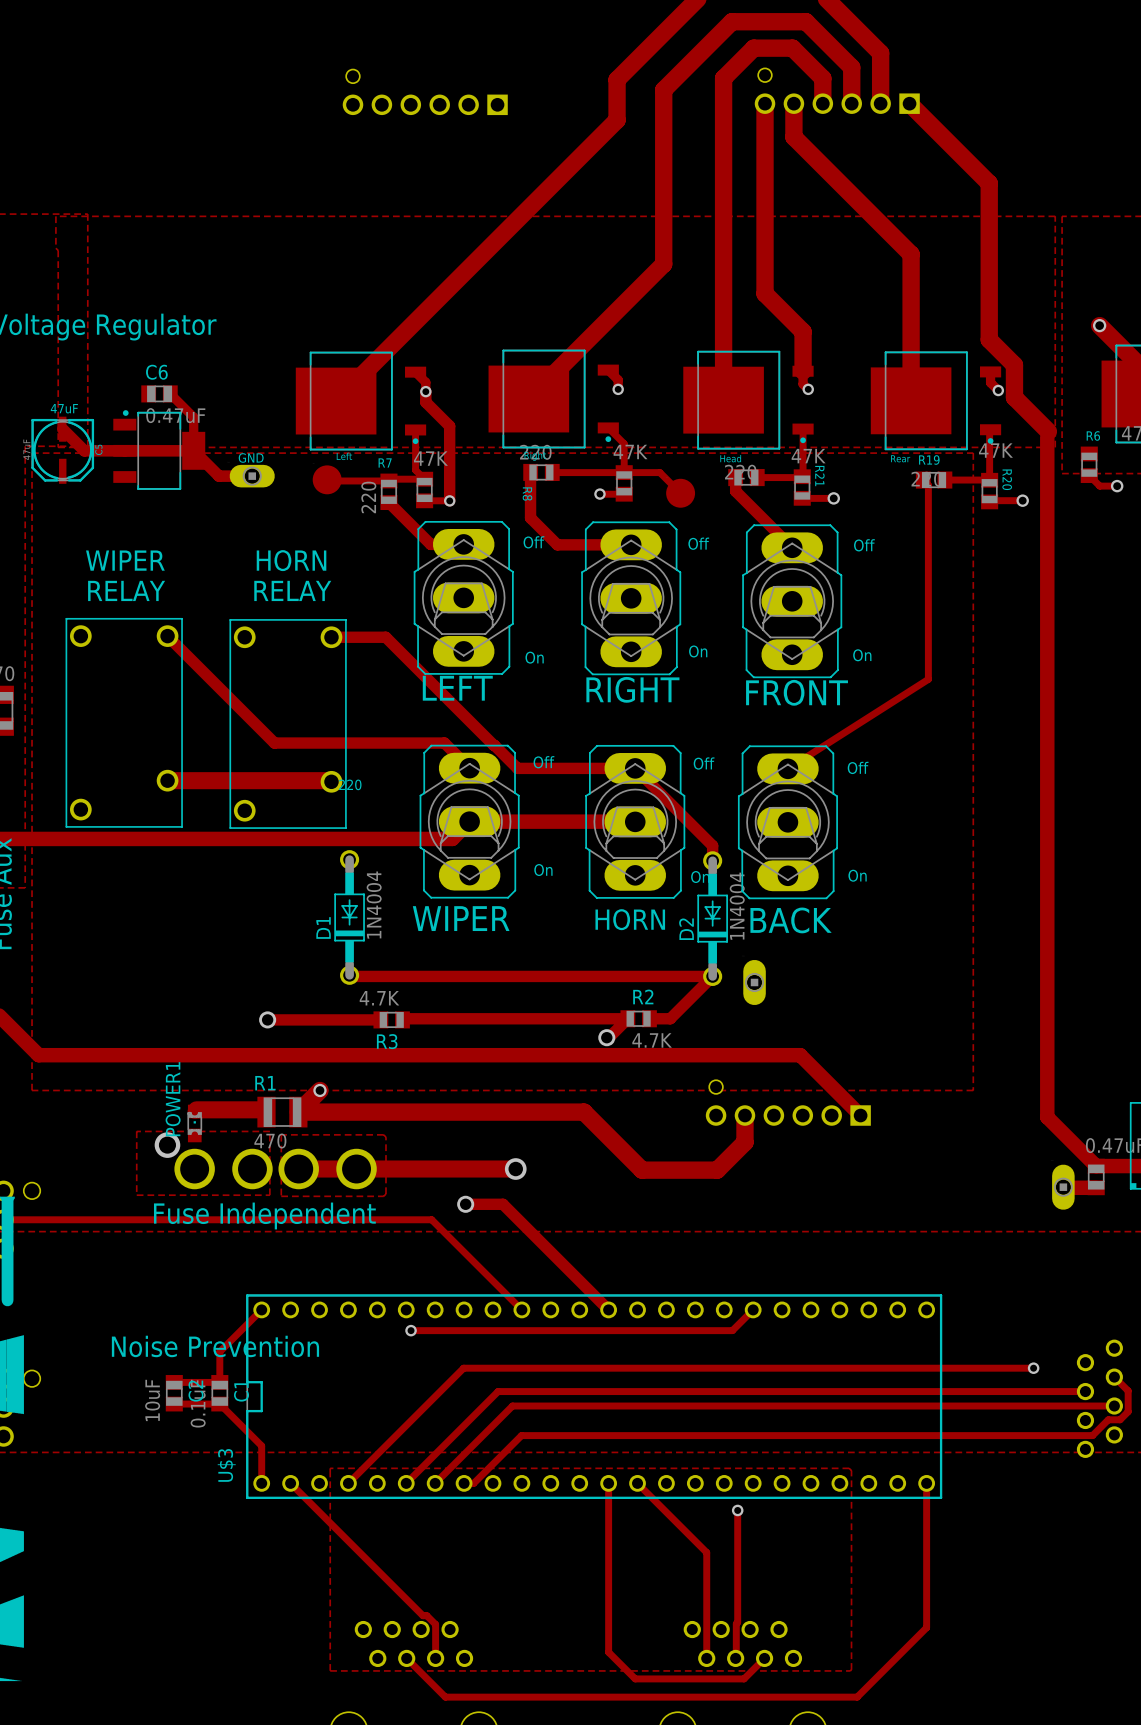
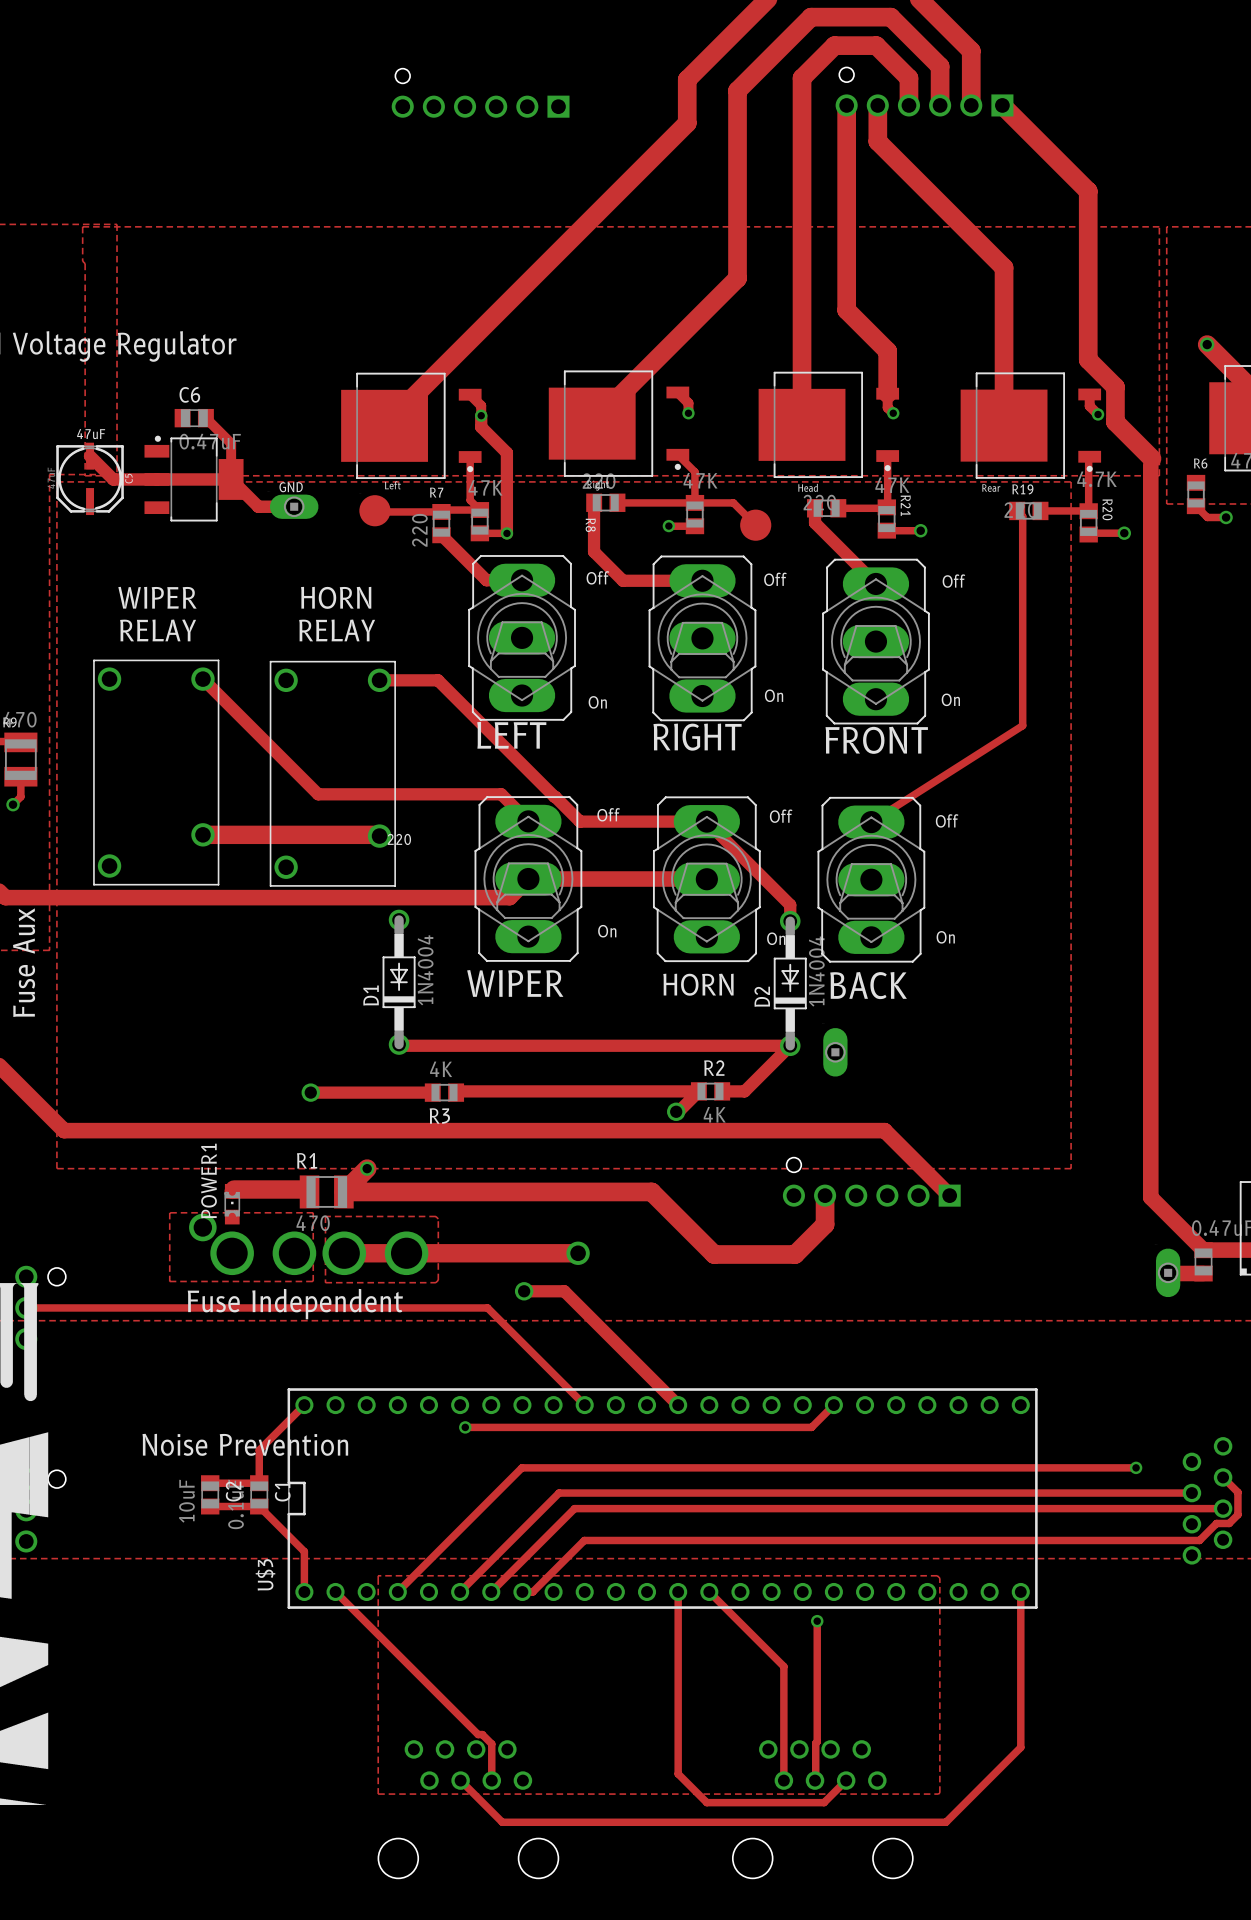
R20 value: 47K (995, 450) -> 4.7K (1097, 479)
R3 value: 4.7K (379, 998) -> 4K (441, 1069)
R2 value: 4.7K (652, 1040) -> 4K (714, 1114)

